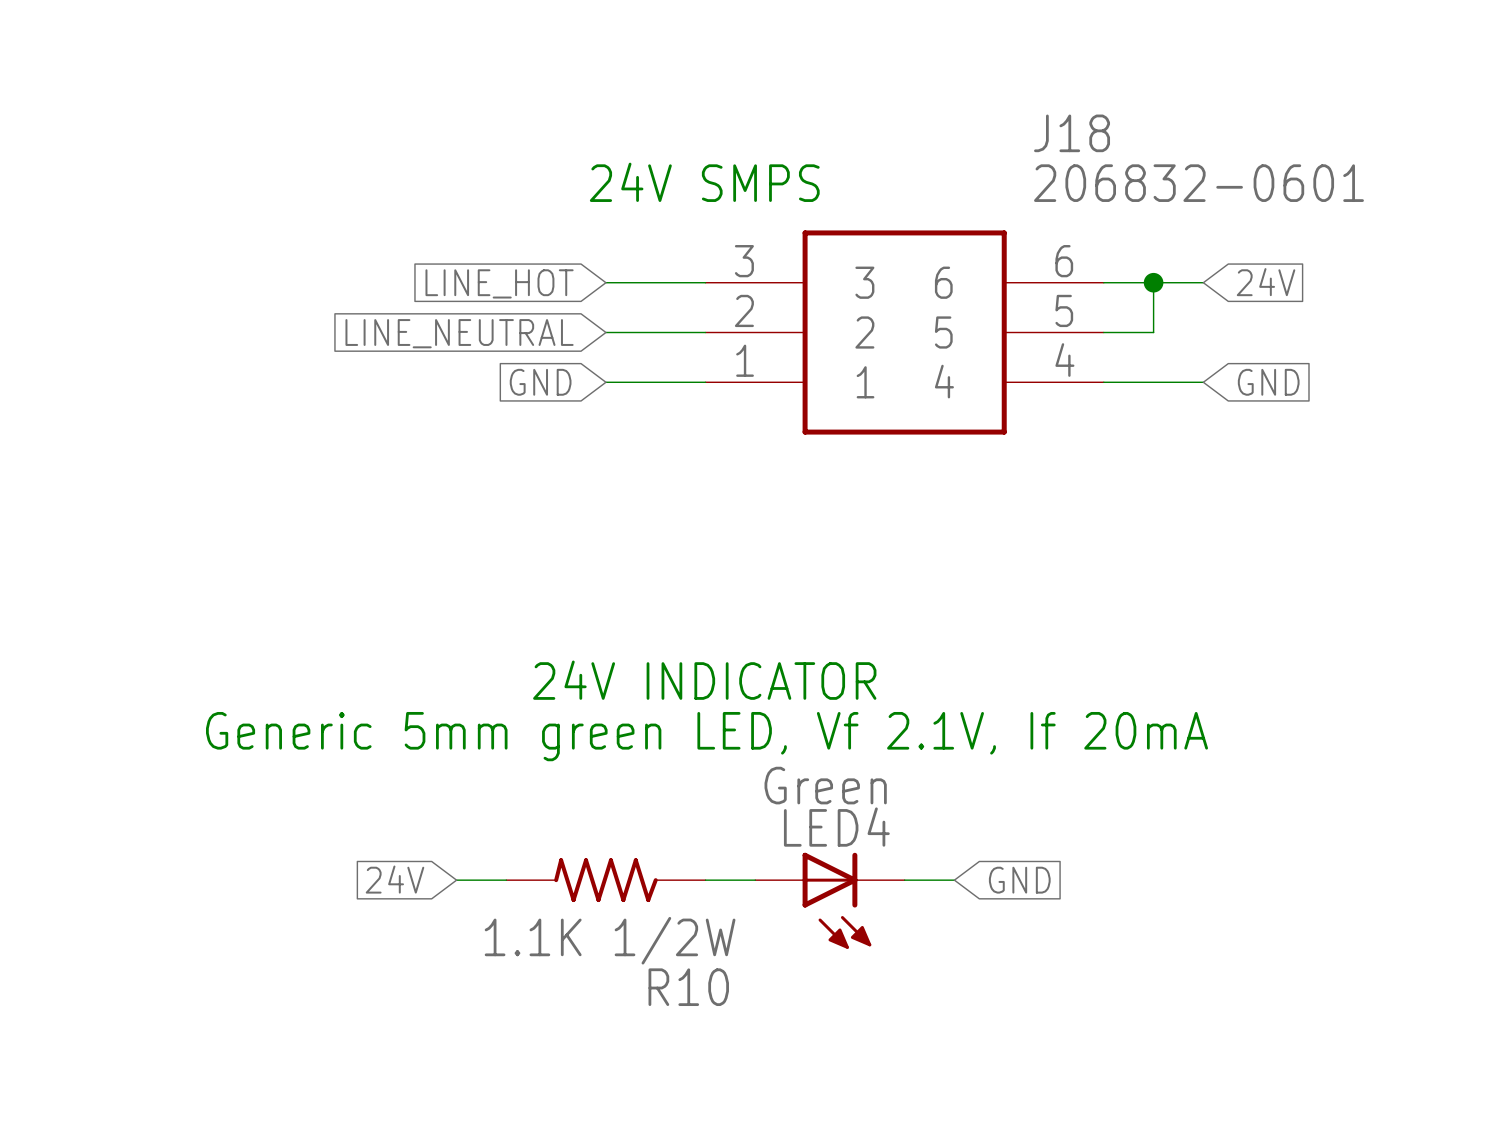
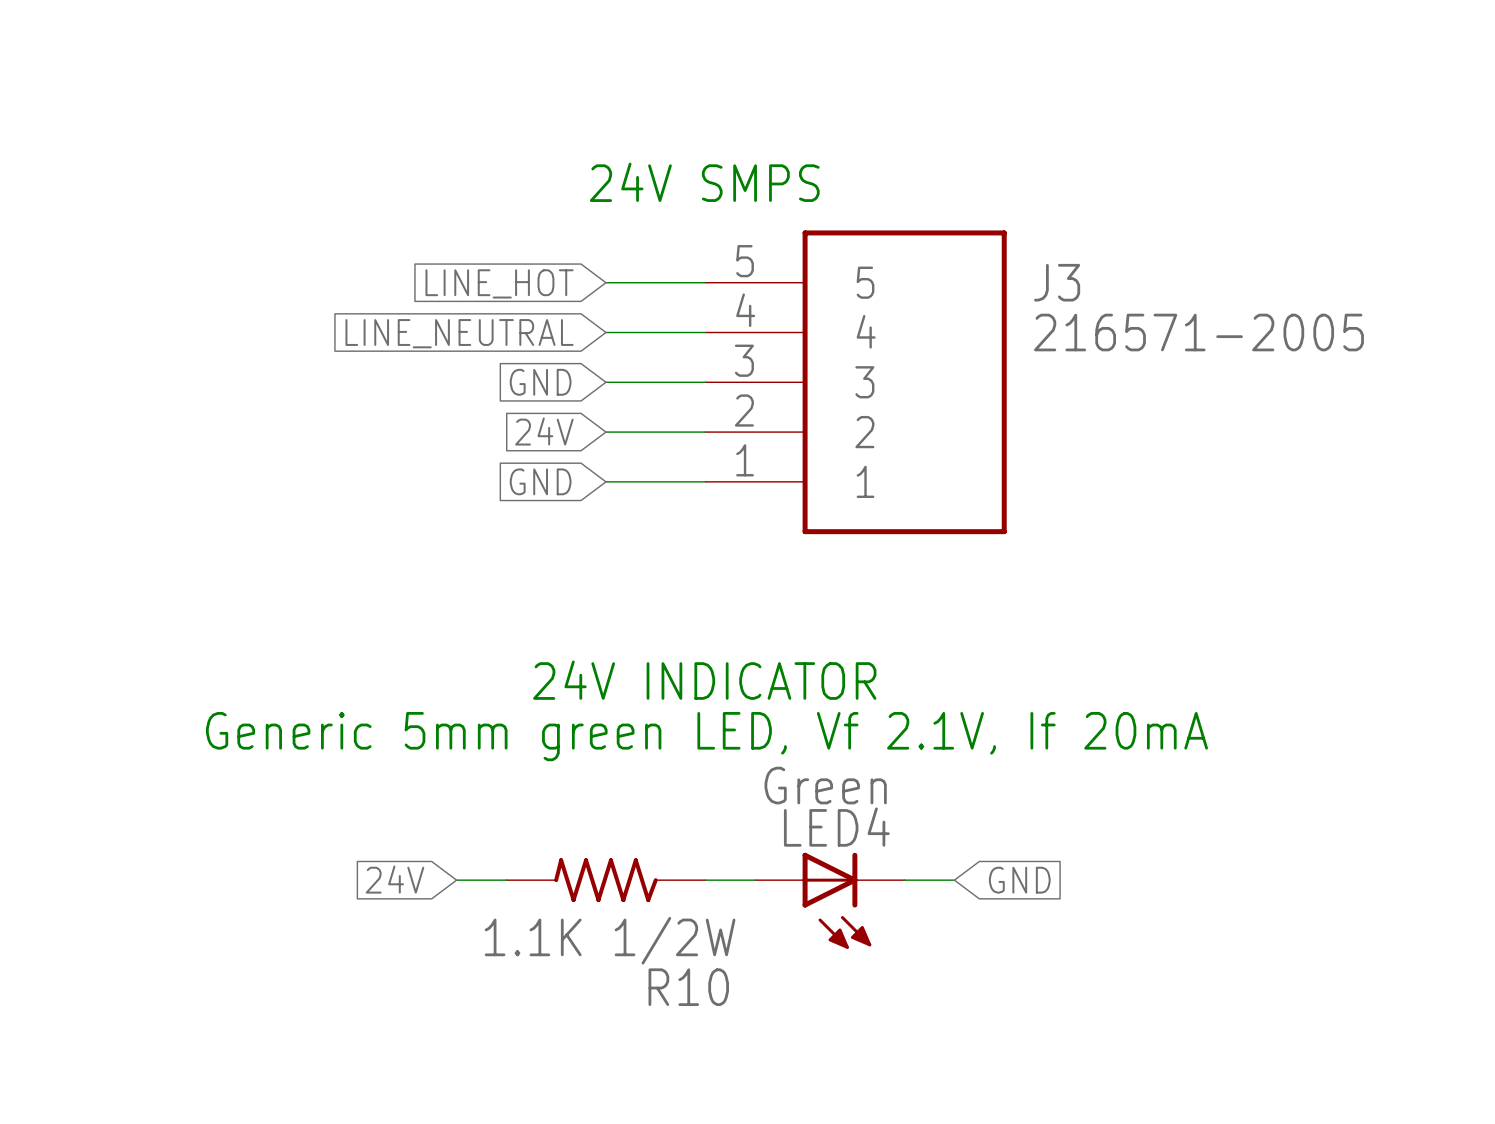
wire: (1103, 282) (1203, 282) -> none
wire: (1153, 282) (1153, 332) (1103, 332) -> none
junction: (1153, 282) -> none
global label: 24V (1266, 282) -> none
J18: 206832-0601 (904, 332) -> none
J3: none -> 216571-2005 (856, 382)
wire: (1103, 382) (1203, 382) -> none
global label: GND (1268, 382) -> none
global label: none -> 24V (544, 431)
wire: none -> (605, 432) (705, 432)
global label: none -> GND (540, 481)
wire: none -> (605, 481) (705, 481)

